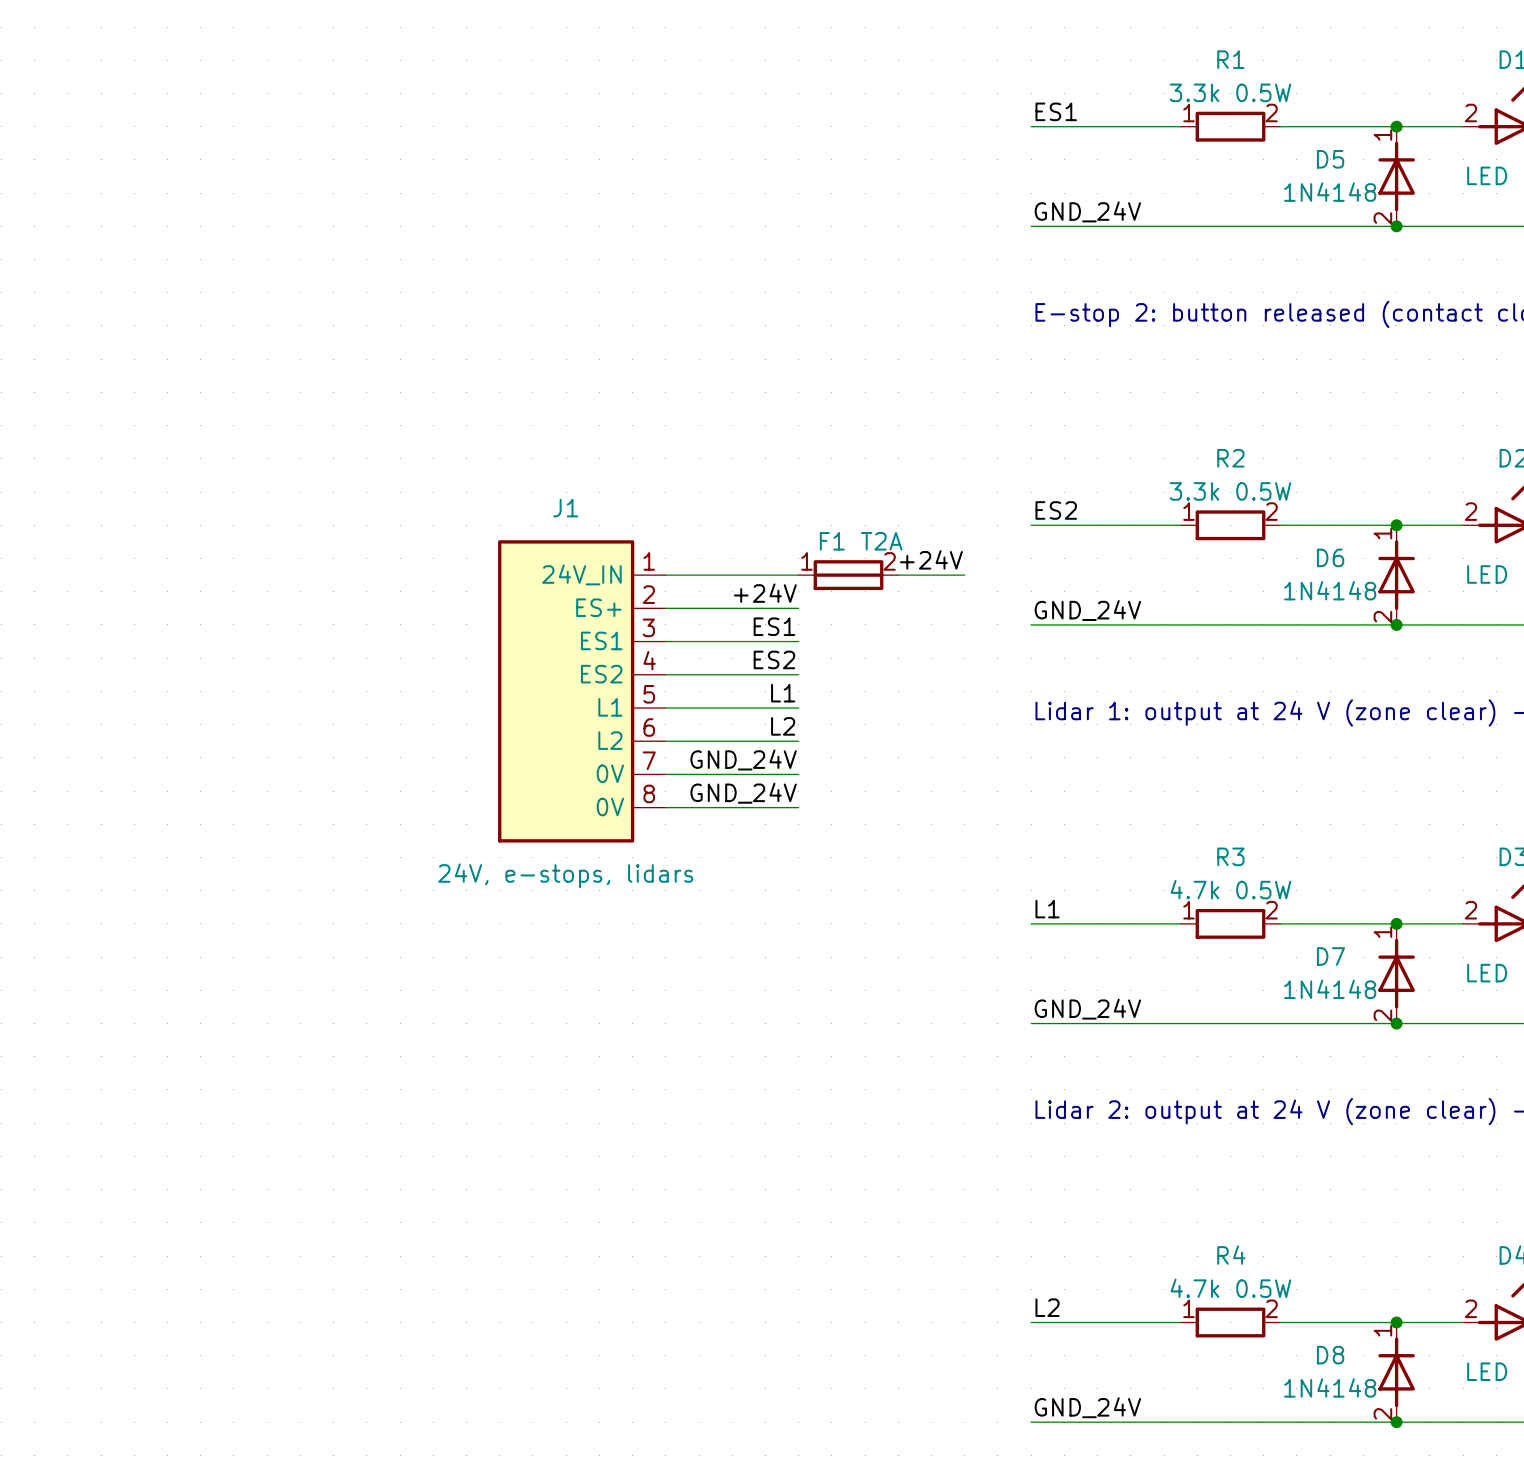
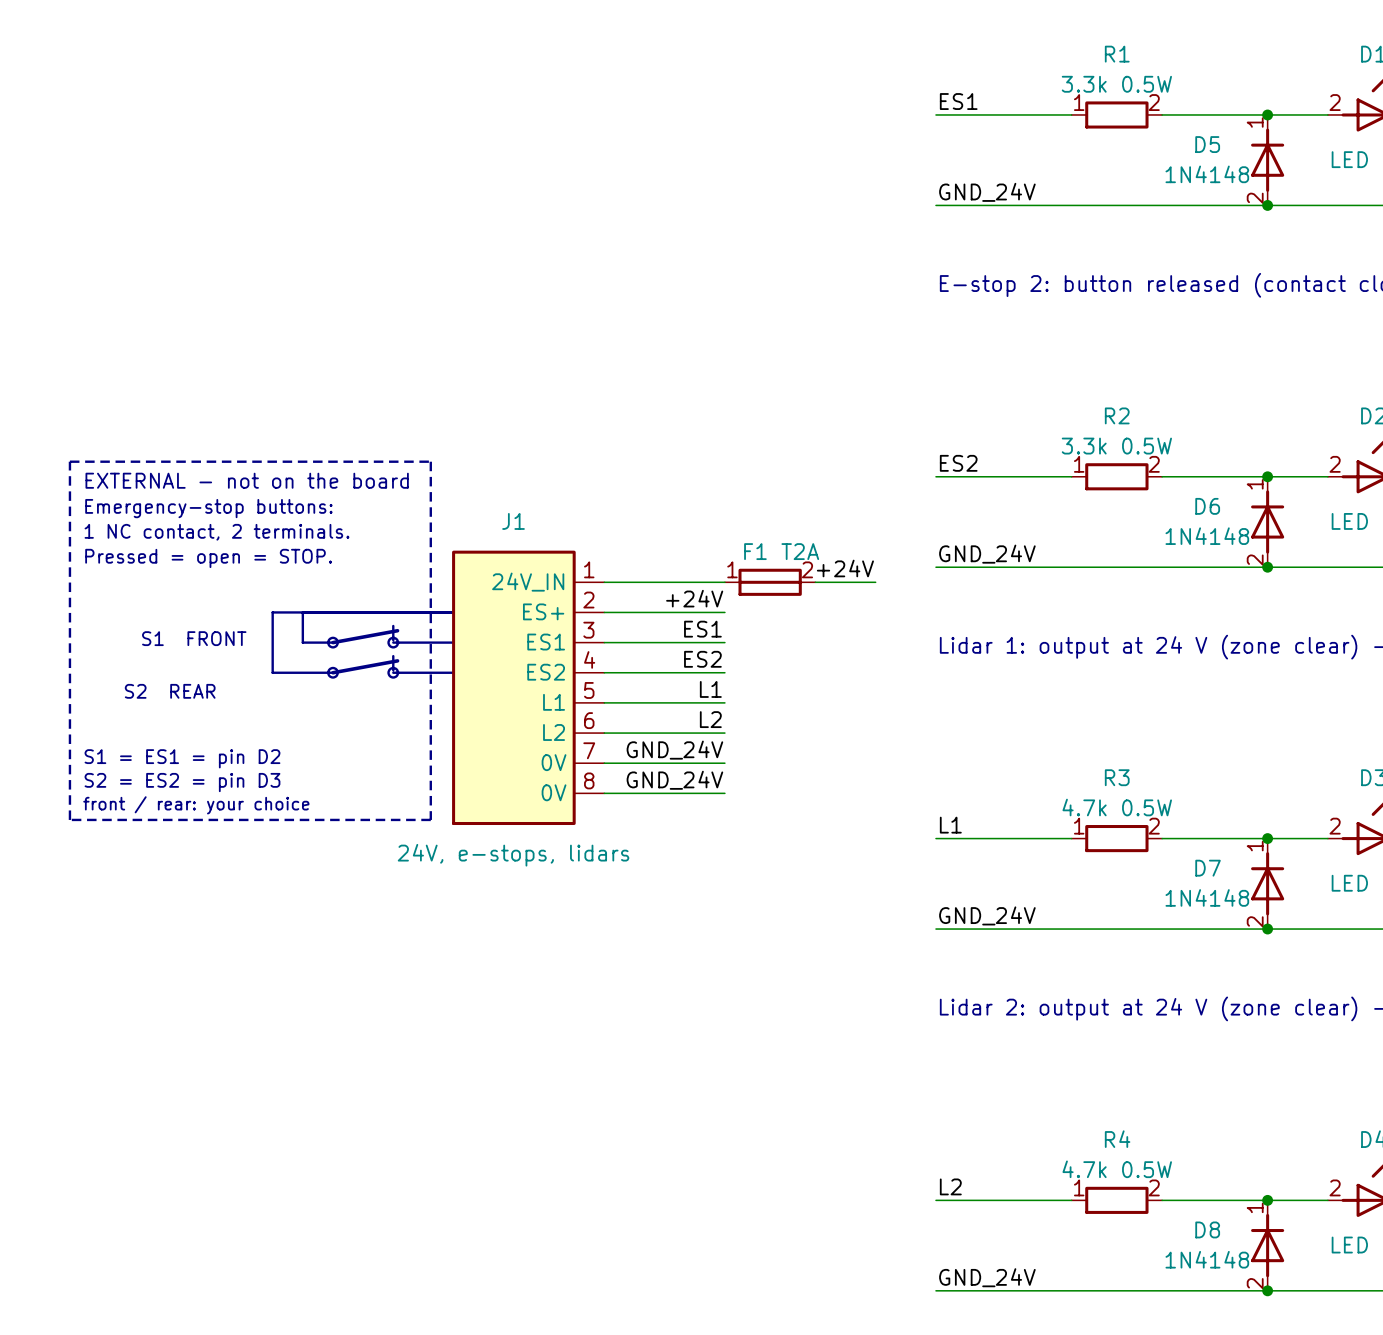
line: none -> (69, 461) (430, 461) (430, 819) (69, 819) (69, 461)
text: none -> EXTERNAL - not on the board (247, 480)
label position: +24V (931, 559) -> +24V (845, 568)
text: none -> Emergency-stop buttons: (208, 508)
wire: (665, 575) (798, 575) -> (604, 763) (724, 763)
F1 position: (848, 575) -> (770, 582)
wire: (898, 575) (964, 575) -> (815, 582) (875, 582)
text: none -> 1 NC contact, 2 terminals. (216, 532)
label: +24V (765, 593) -> none
wire: (665, 608) (798, 608) -> (604, 793) (724, 793)
text: none -> Pressed = open = STOP. (208, 558)
label: ES1 (774, 626) -> none
label: ES2 (774, 659) -> +24V (694, 598)
line: none -> (302, 612) (302, 642) (332, 642) (397, 630)
line: none -> (453, 612) (272, 612) (272, 672) (332, 672) (397, 660)
line: none -> (393, 625) (393, 640)
J1 position: (581, 691) -> (528, 687)
label: L1 (783, 693) -> ES1 (702, 629)
drawing: none -> [327, 636, 339, 649]
drawing: none -> [387, 636, 400, 649]
text: none -> S1 FRONT (194, 638)
line: none -> (393, 642) (453, 642)
line: none -> (393, 656) (393, 670)
label: L2 (783, 726) -> ES2 (702, 659)
drawing: none -> [327, 666, 339, 679]
drawing: none -> [387, 666, 400, 679]
line: none -> (393, 672) (453, 672)
label: GND_24V (743, 759) -> L1 (710, 689)
text: none -> S2 REAR (170, 691)
label: GND_24V (743, 793) -> L2 (710, 719)
label: none -> GND_24V (674, 750)
text: none -> S1 = ES1 = pin D2 (182, 758)
label: none -> GND_24V (674, 780)
text: none -> S2 = ES2 = pin D3 (182, 782)
text: none -> front / rear: your choice (196, 805)

